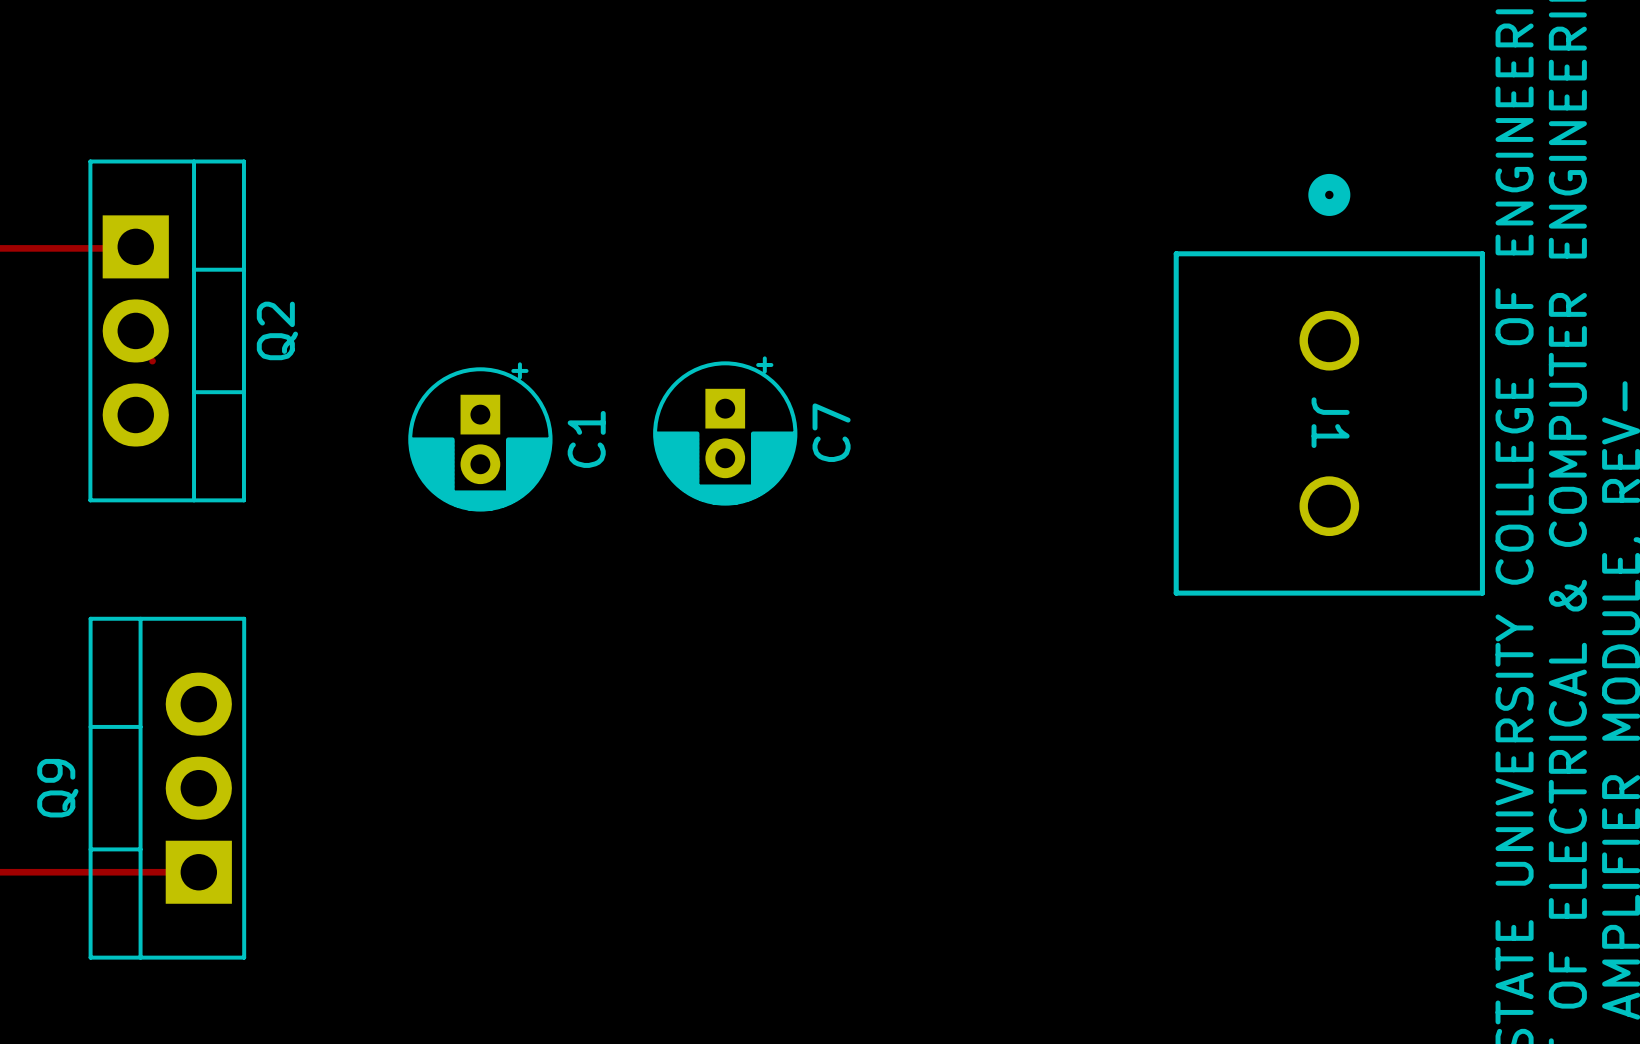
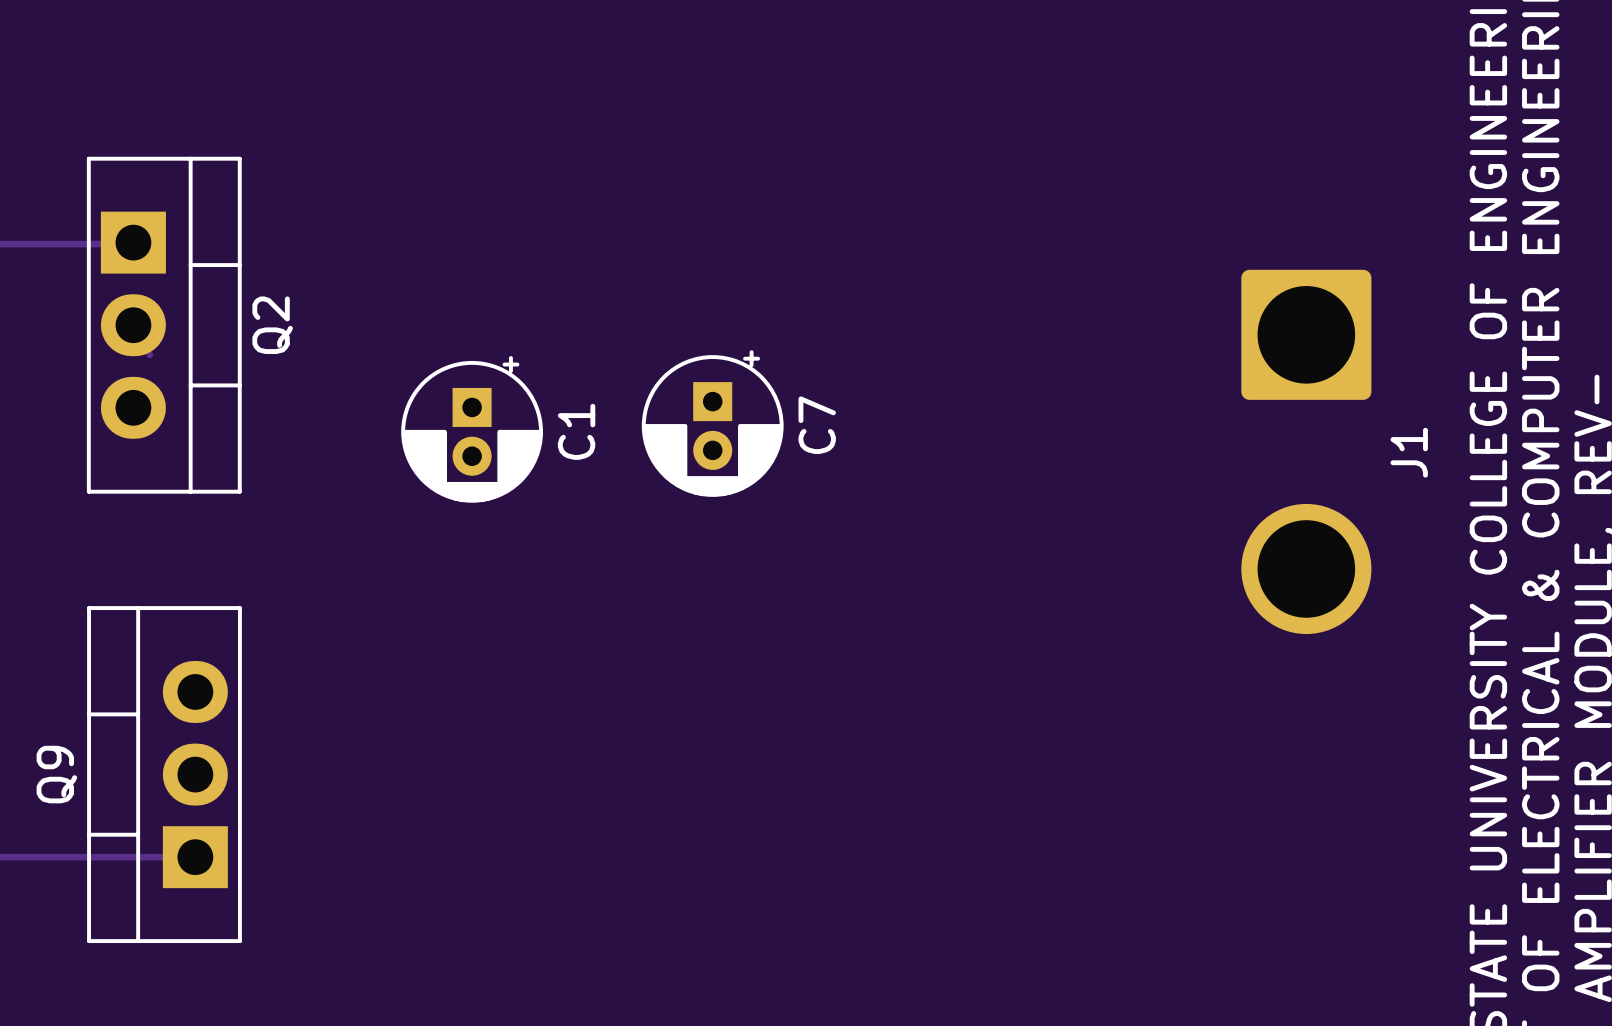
J1 footprint: [1173, 173, 1485, 596] -> [1241, 269, 1372, 635]
J1 name position: J1 (1330, 422) -> J1 (1409, 452)

